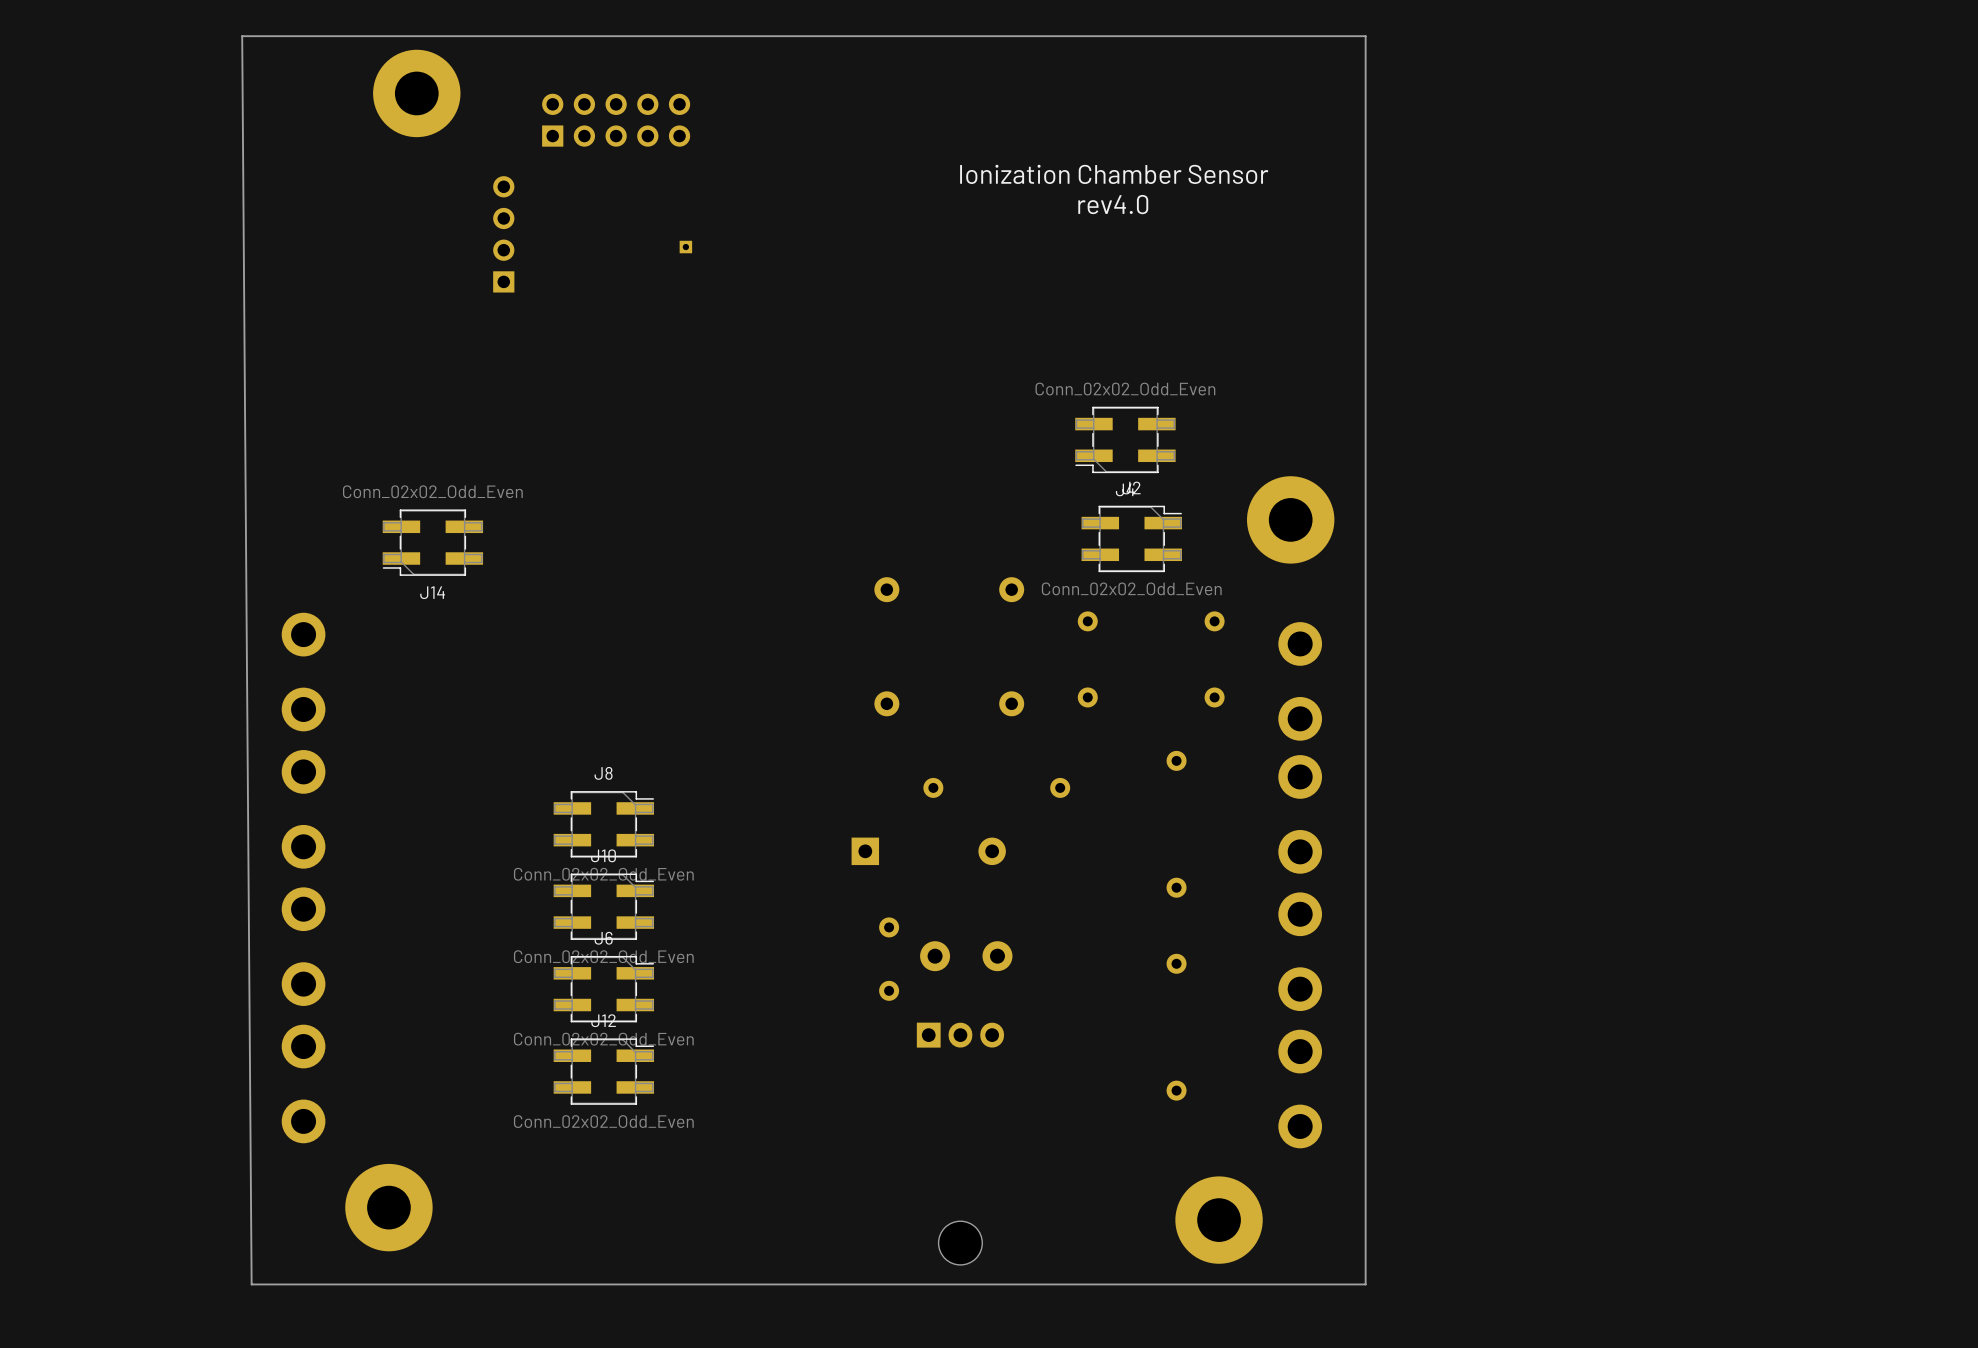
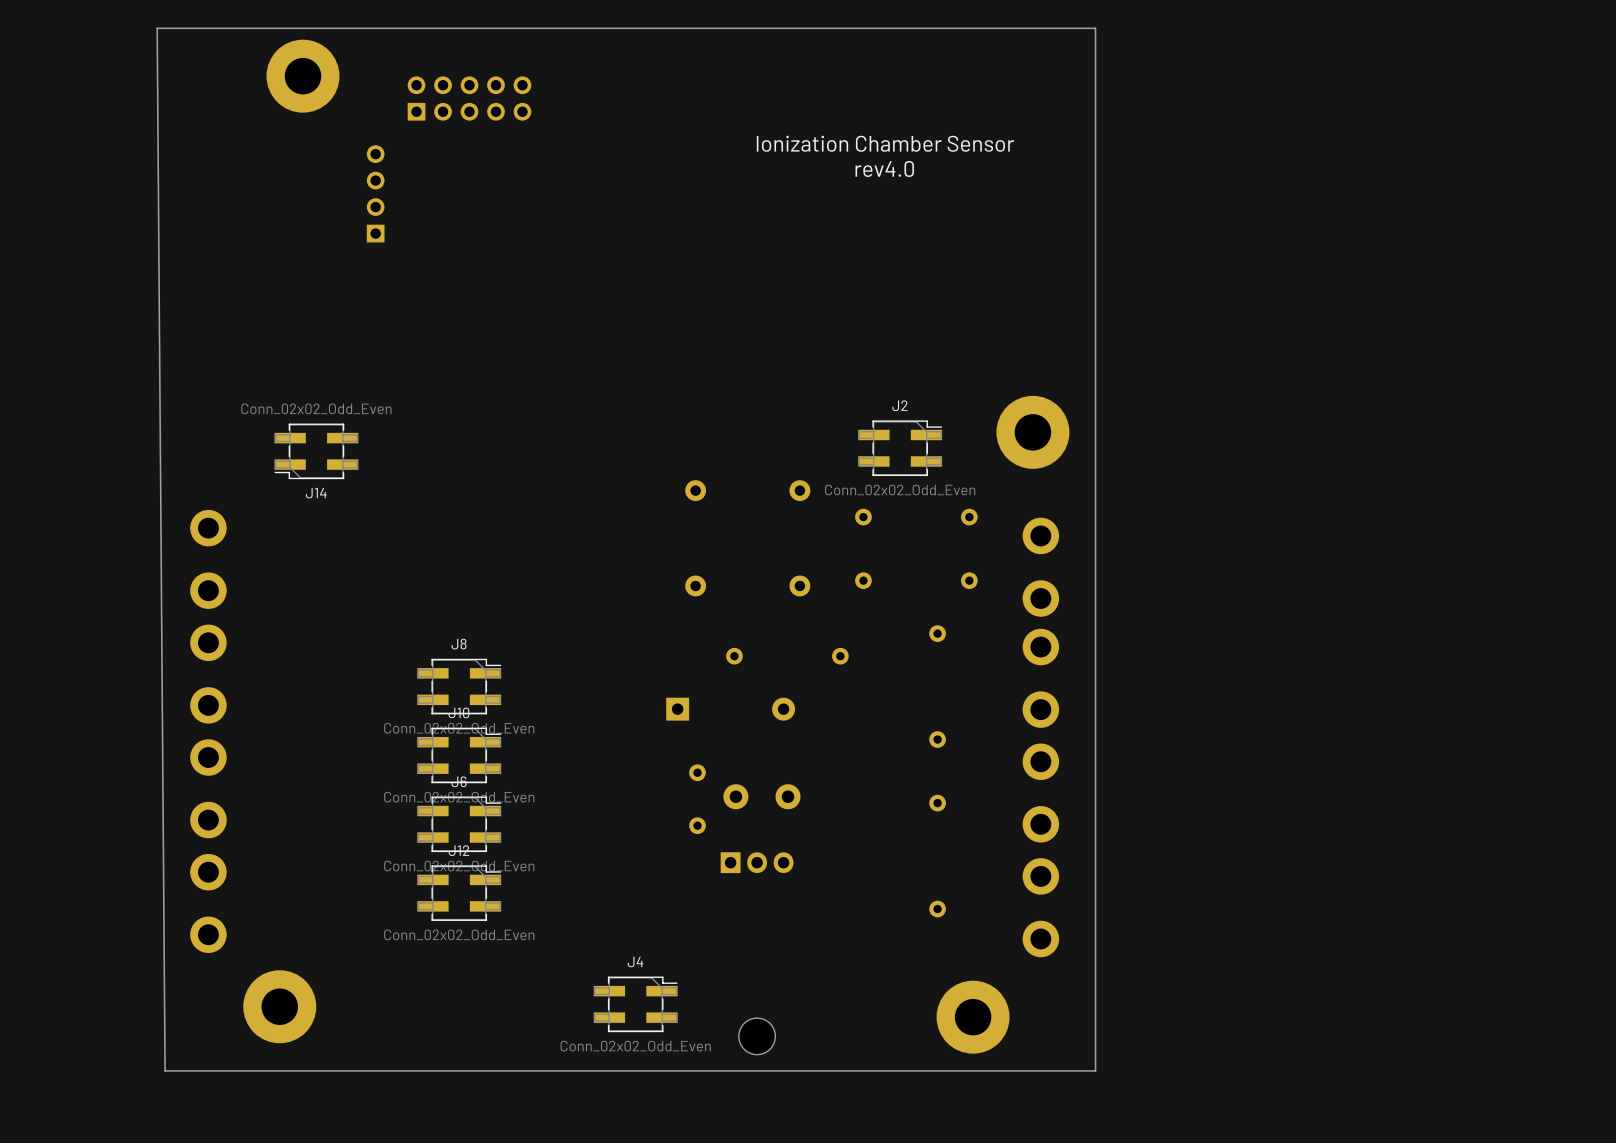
part: (685, 247) -> none
J4 rotation: 0° (1125, 439) -> 180° (635, 1004)
J4 position: (1125, 439) -> (635, 1004)

